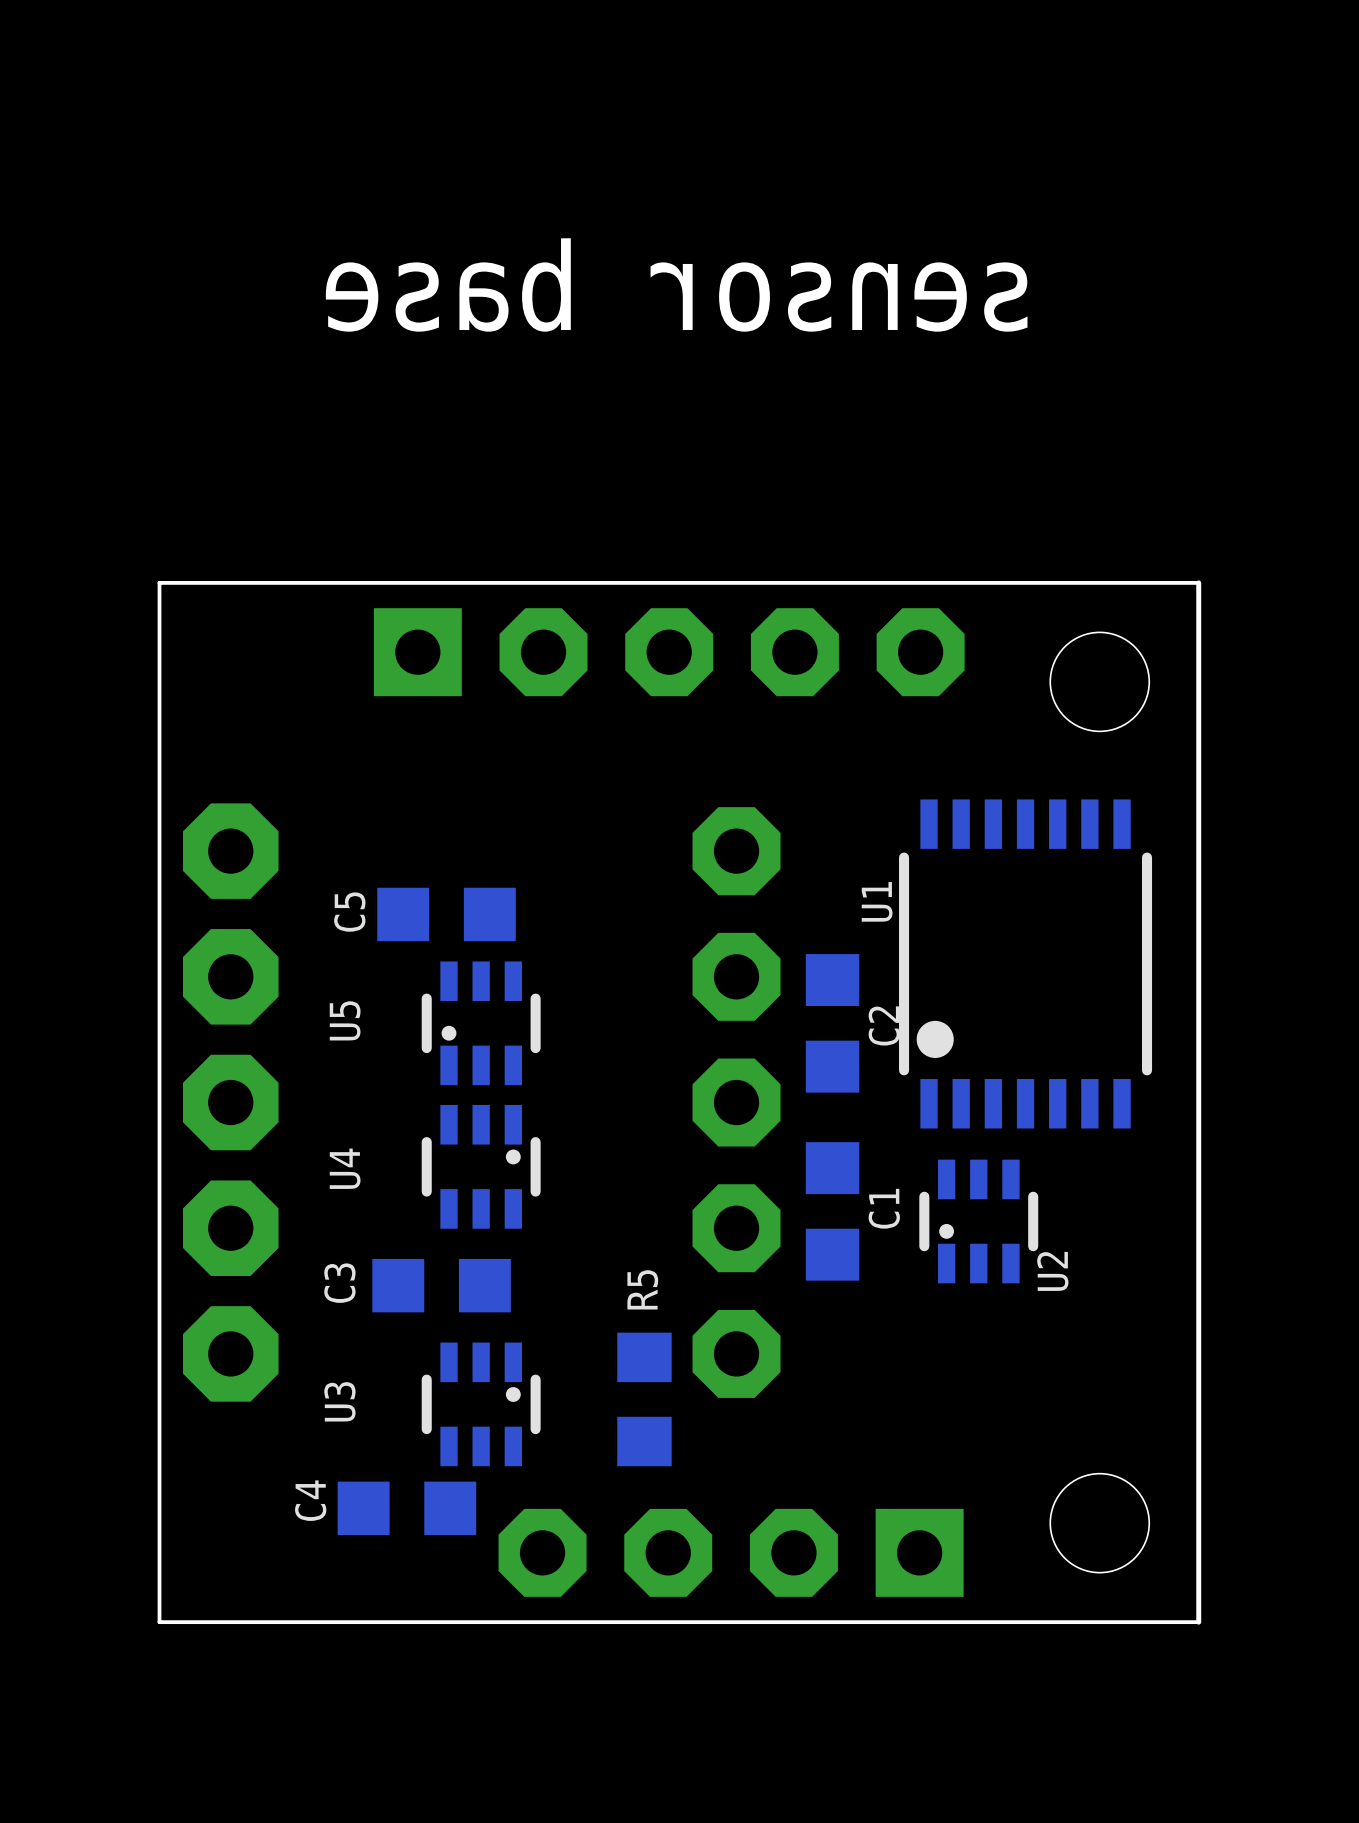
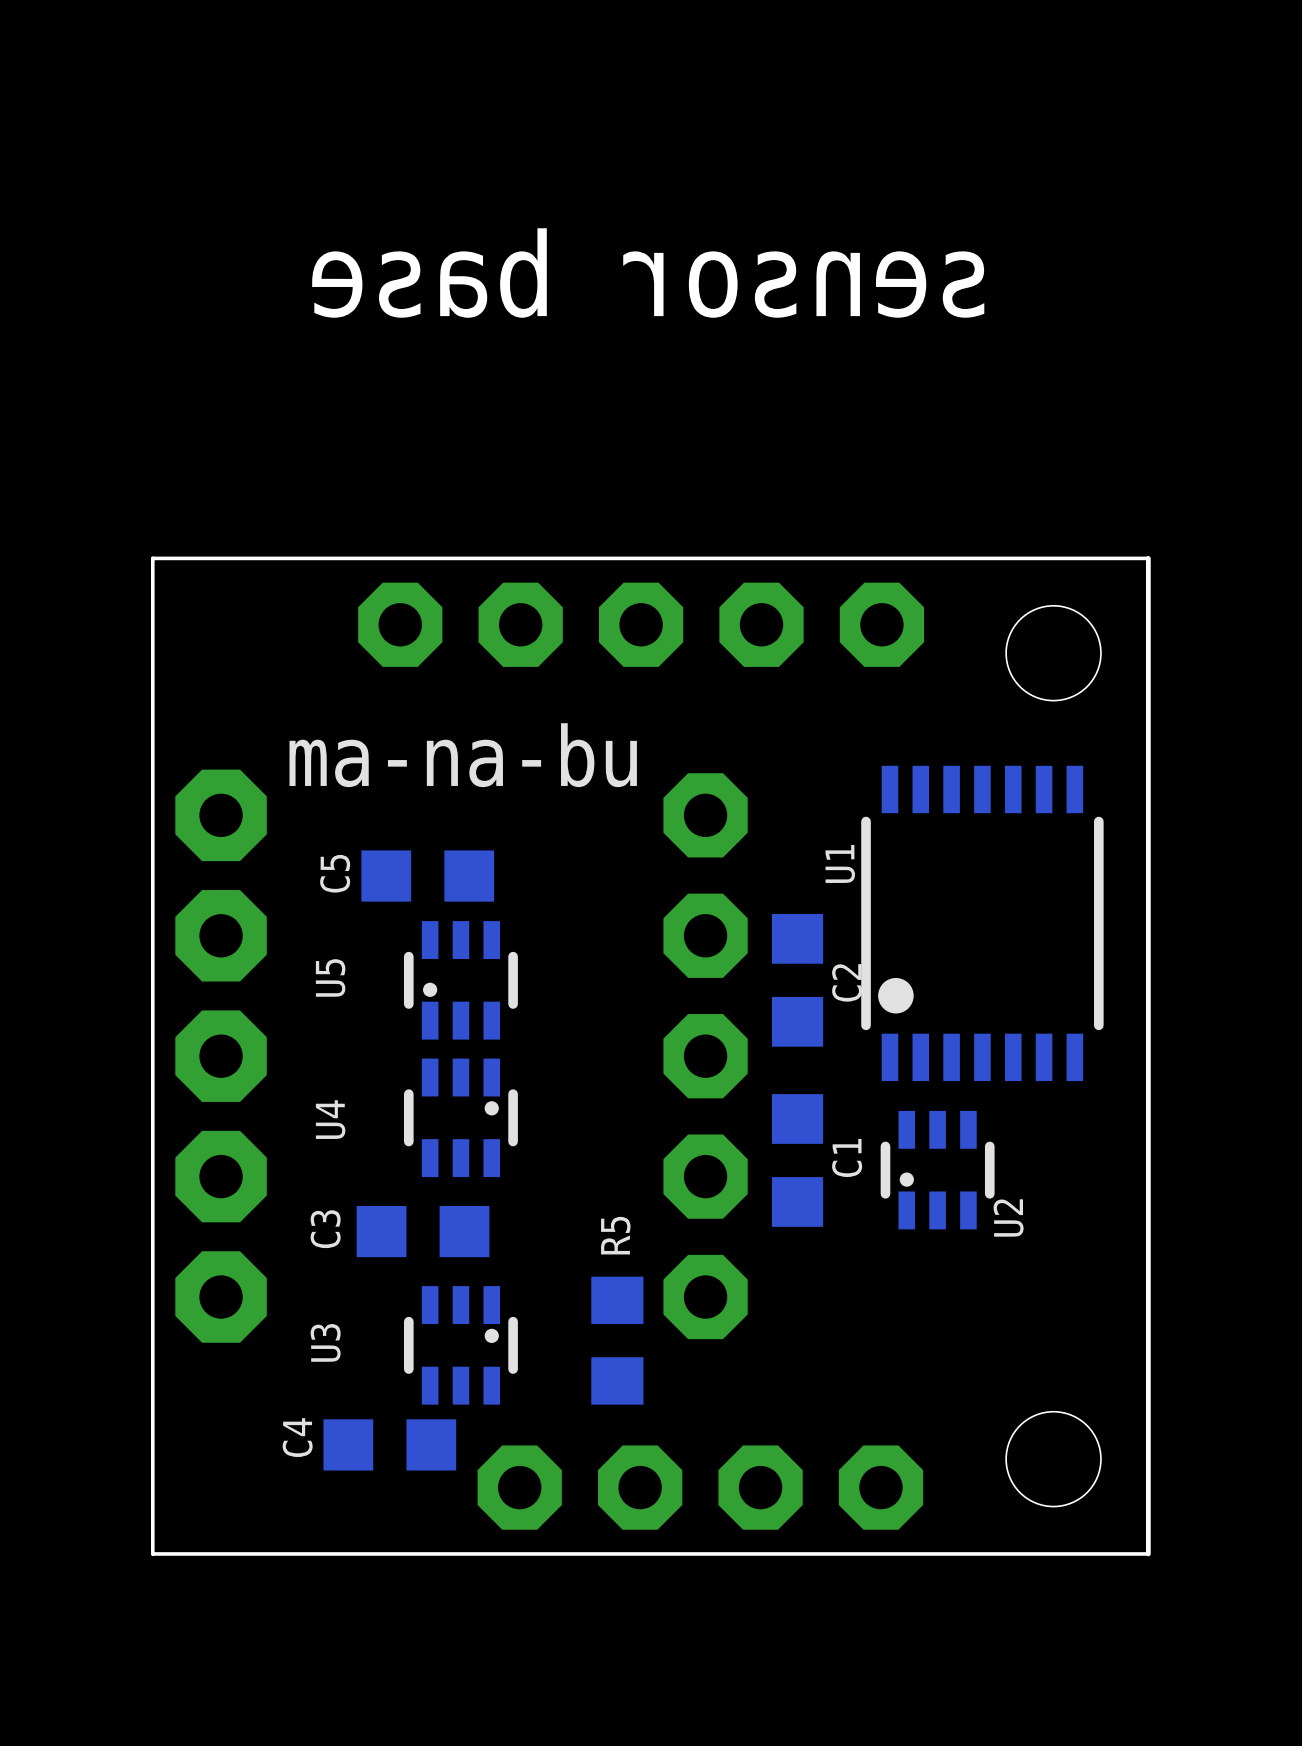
part footprint: [373, 608, 965, 697] -> [358, 582, 925, 667]
text: none -> ma-na-bu (463, 755)
part footprint: [498, 1508, 964, 1597] -> [477, 1445, 924, 1530]

